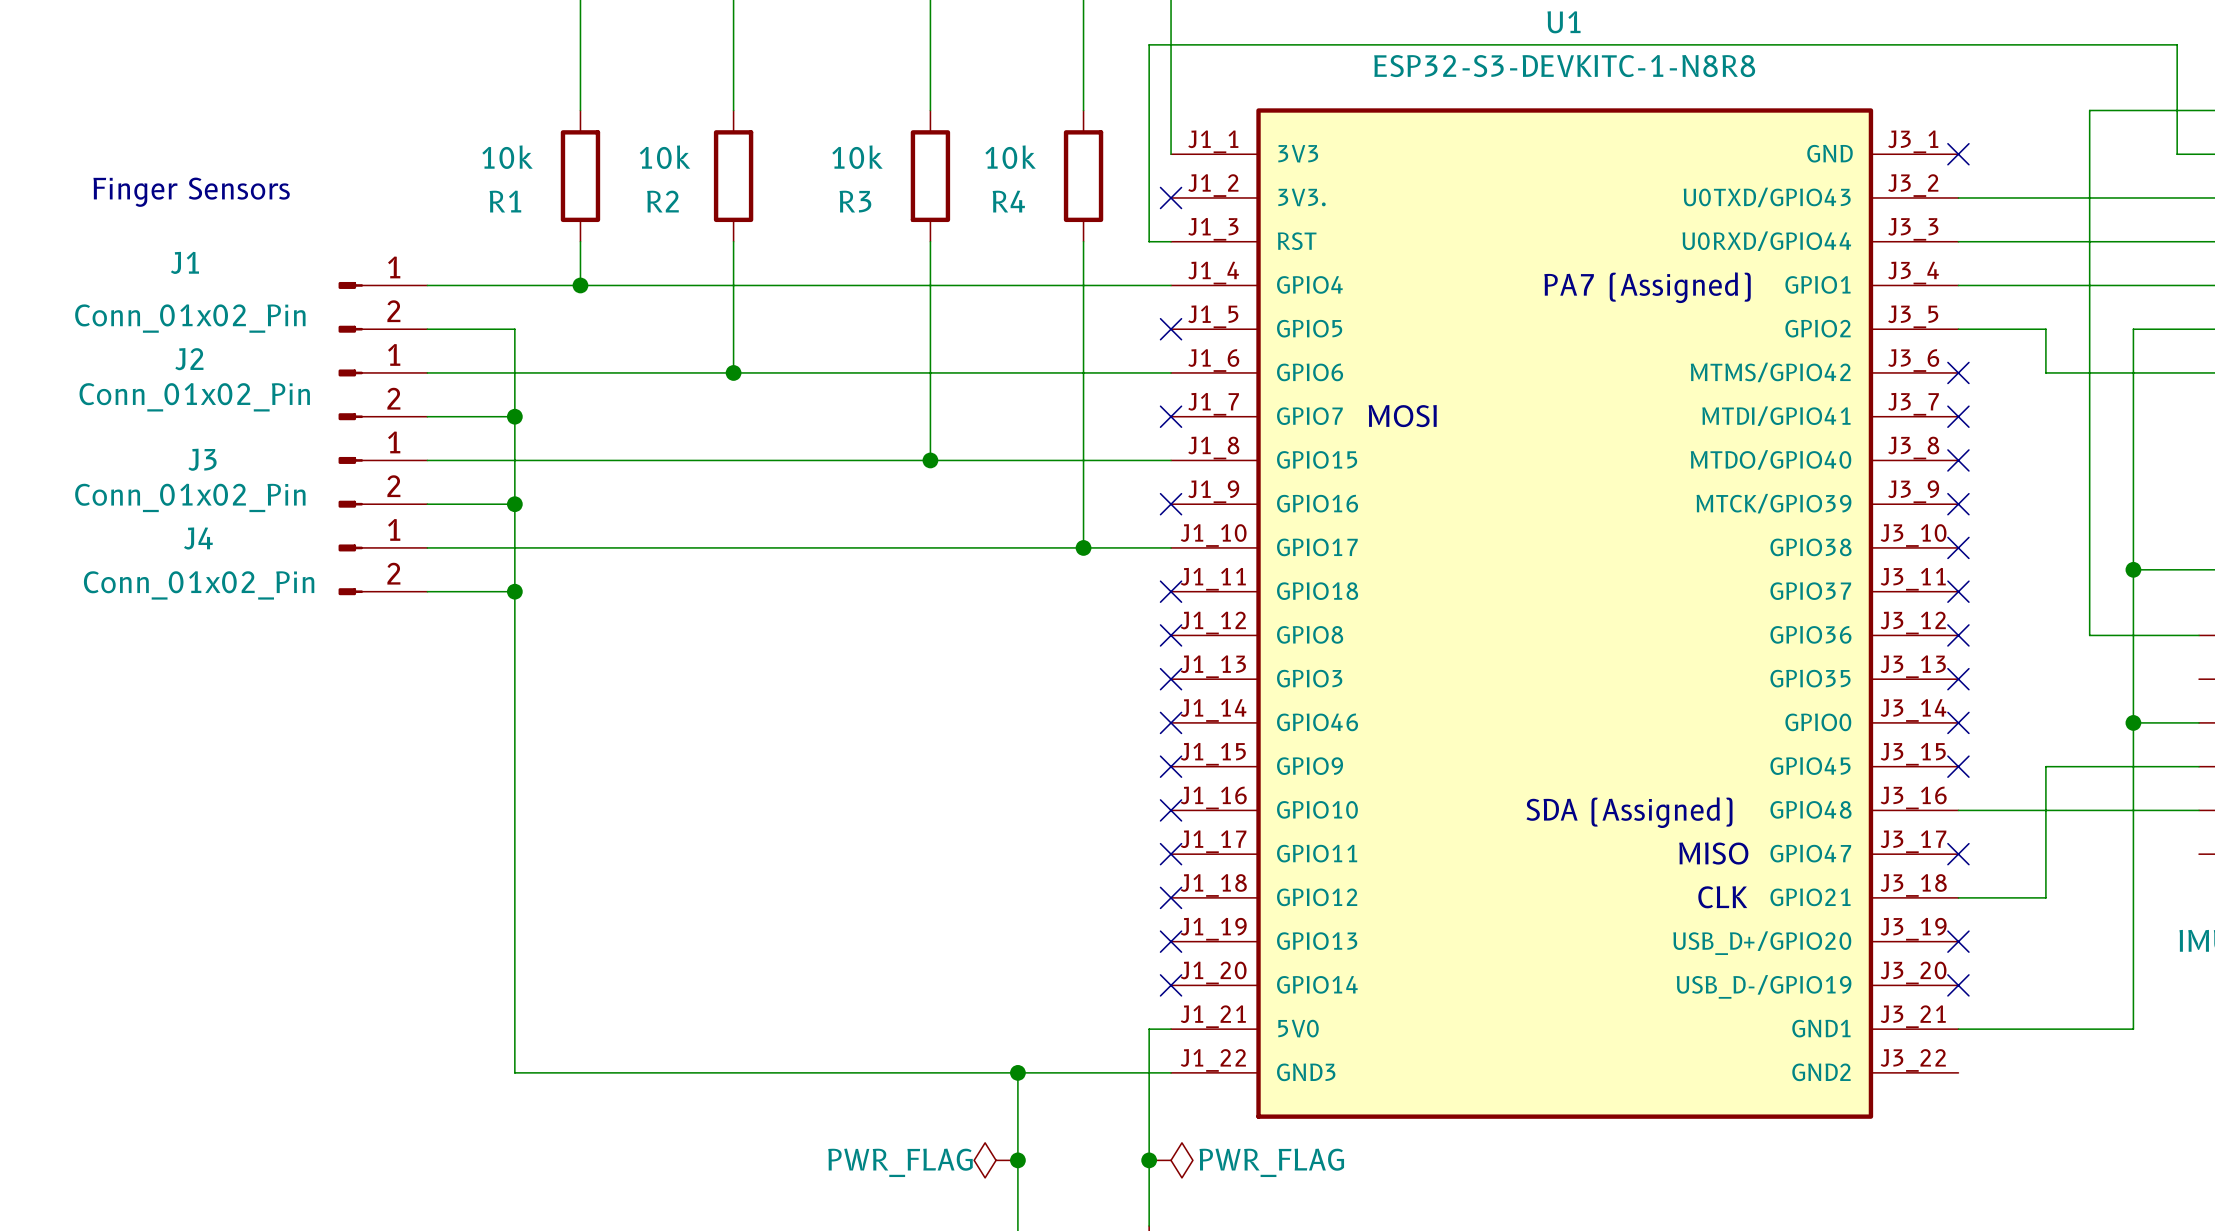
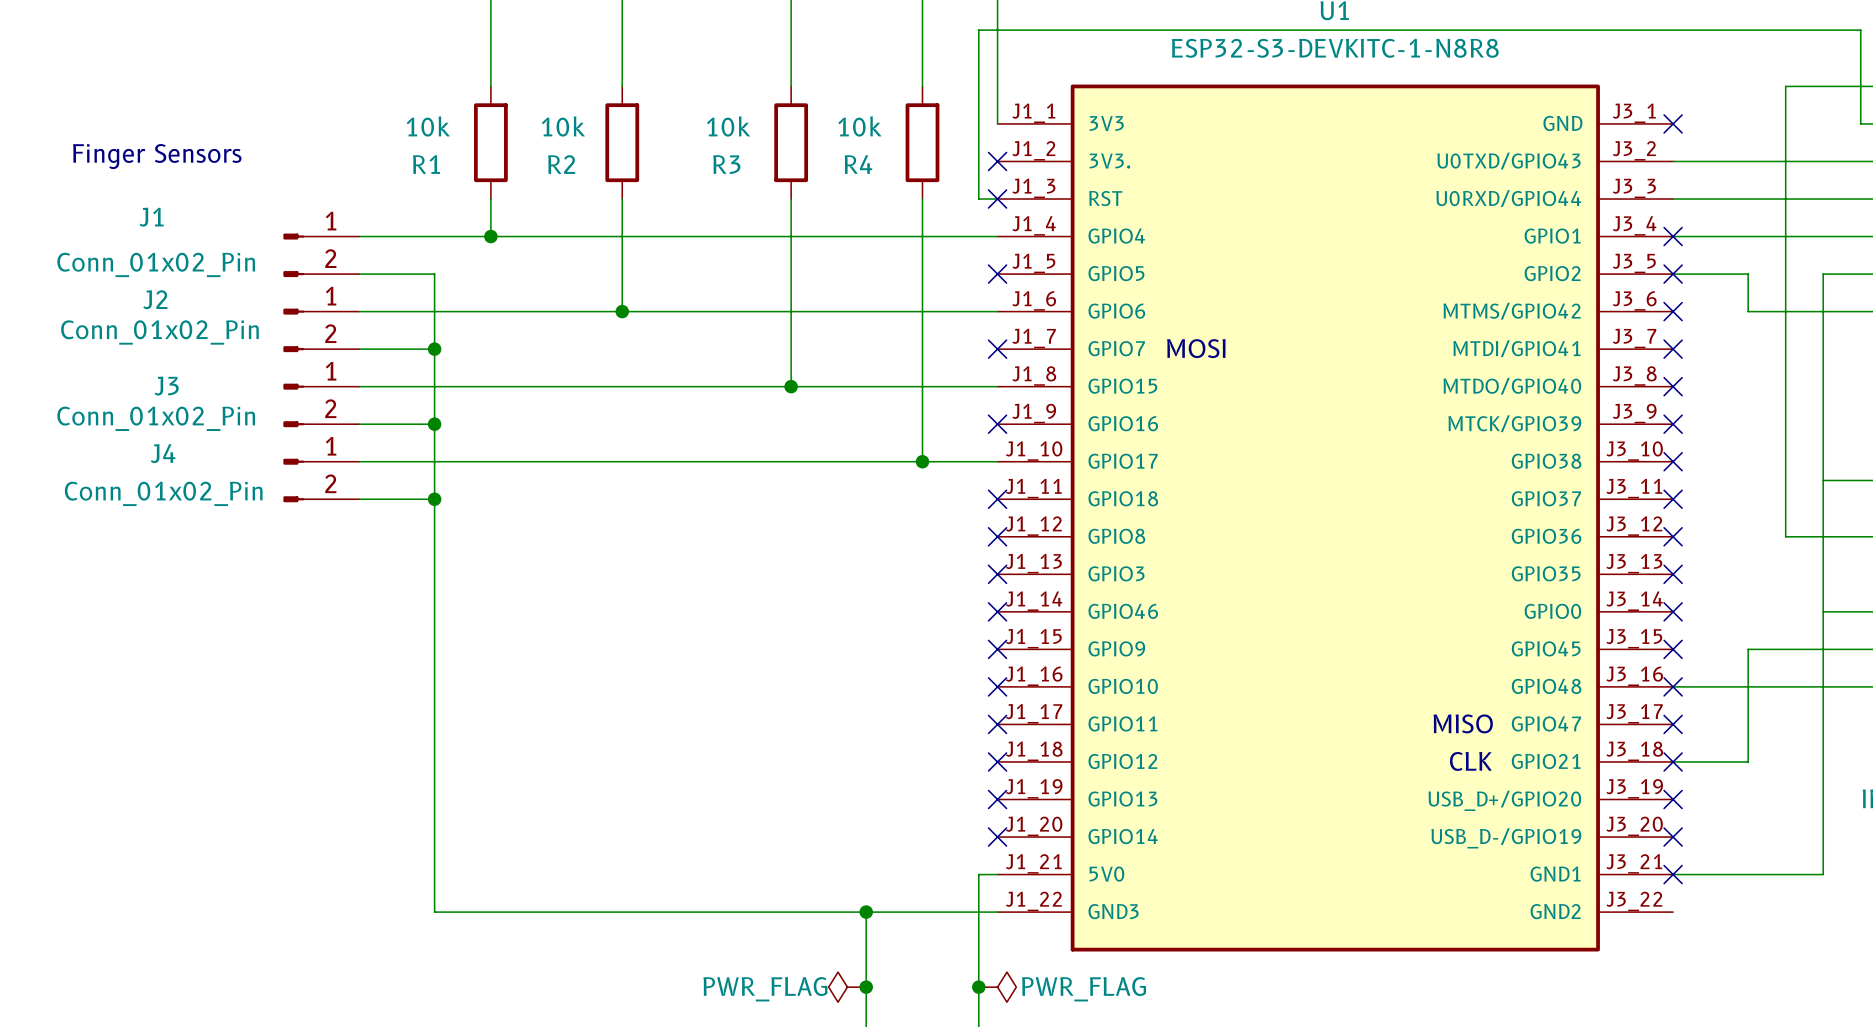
no-connect mark: none -> (997, 199)
no-connect mark: none -> (1673, 236)
text: PA7 (Assigned) (1647, 287) -> none
no-connect mark: none -> (1673, 274)
junction: (2133, 569) -> none
junction: (2133, 722) -> none
no-connect mark: none -> (1673, 686)
text: SDA (Assigned) (1629, 812) -> none
no-connect mark: none -> (1673, 761)
no-connect mark: none -> (1673, 874)

